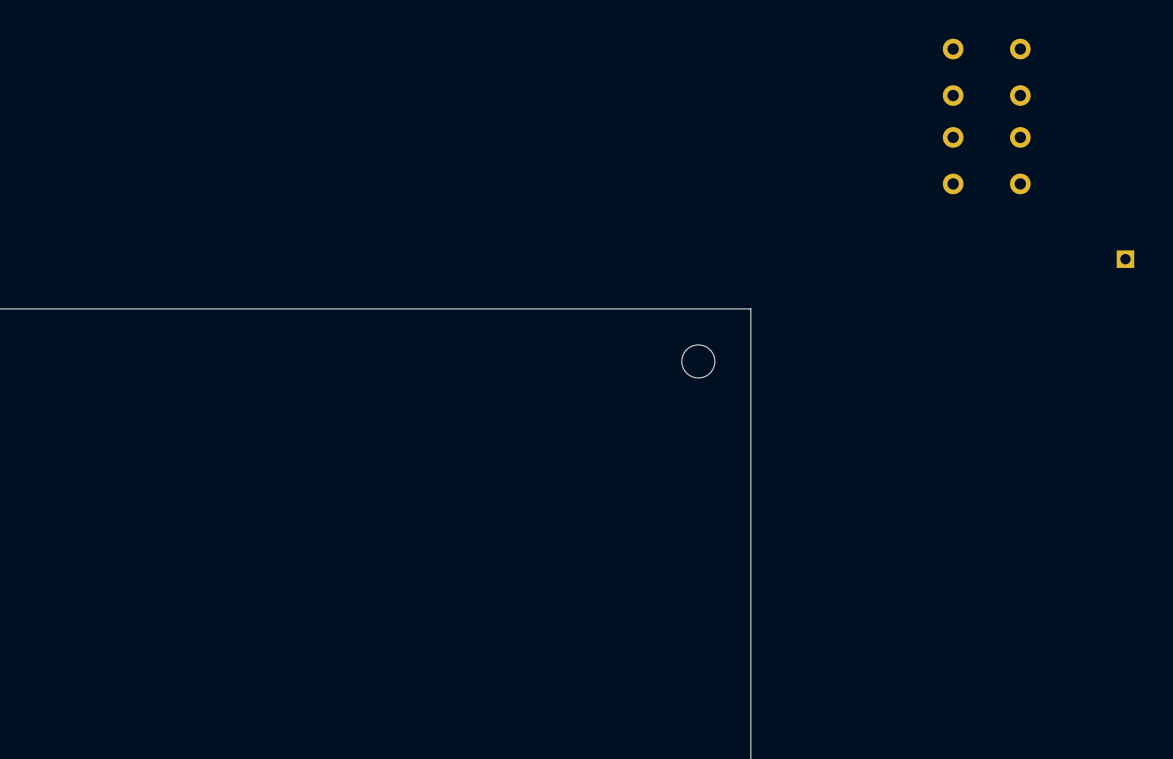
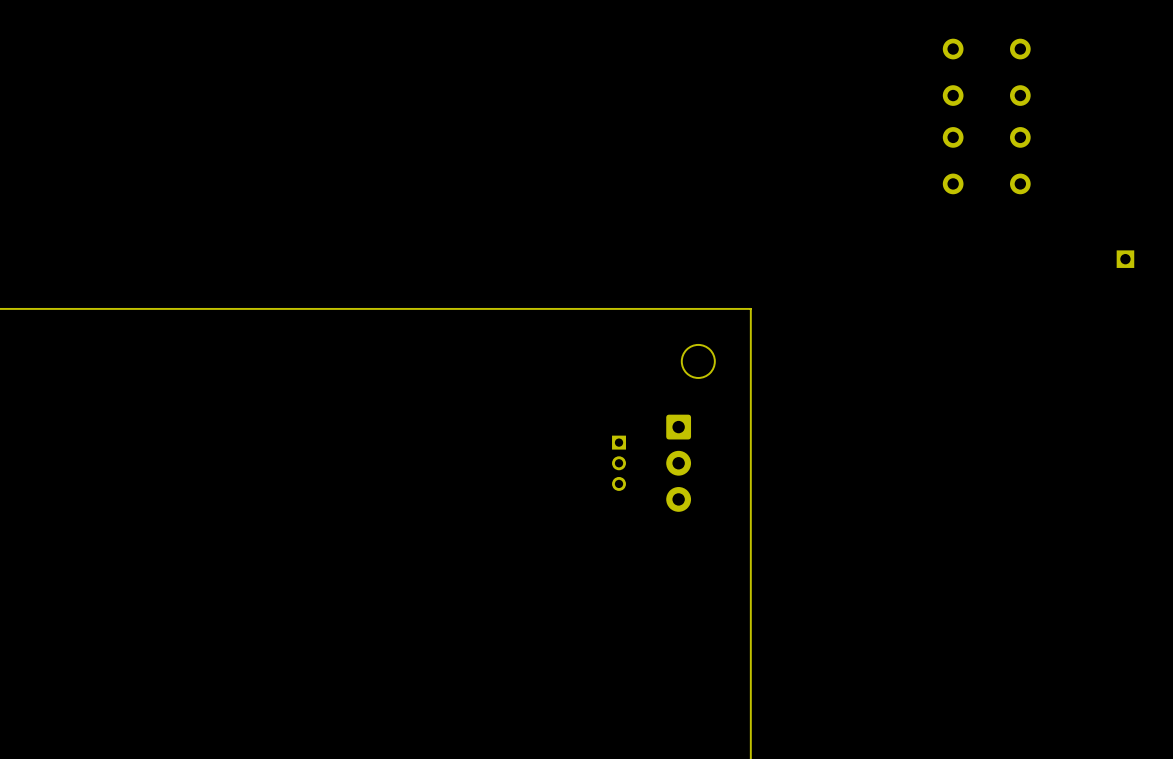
part: none -> (619, 463)
part: none -> (678, 463)

